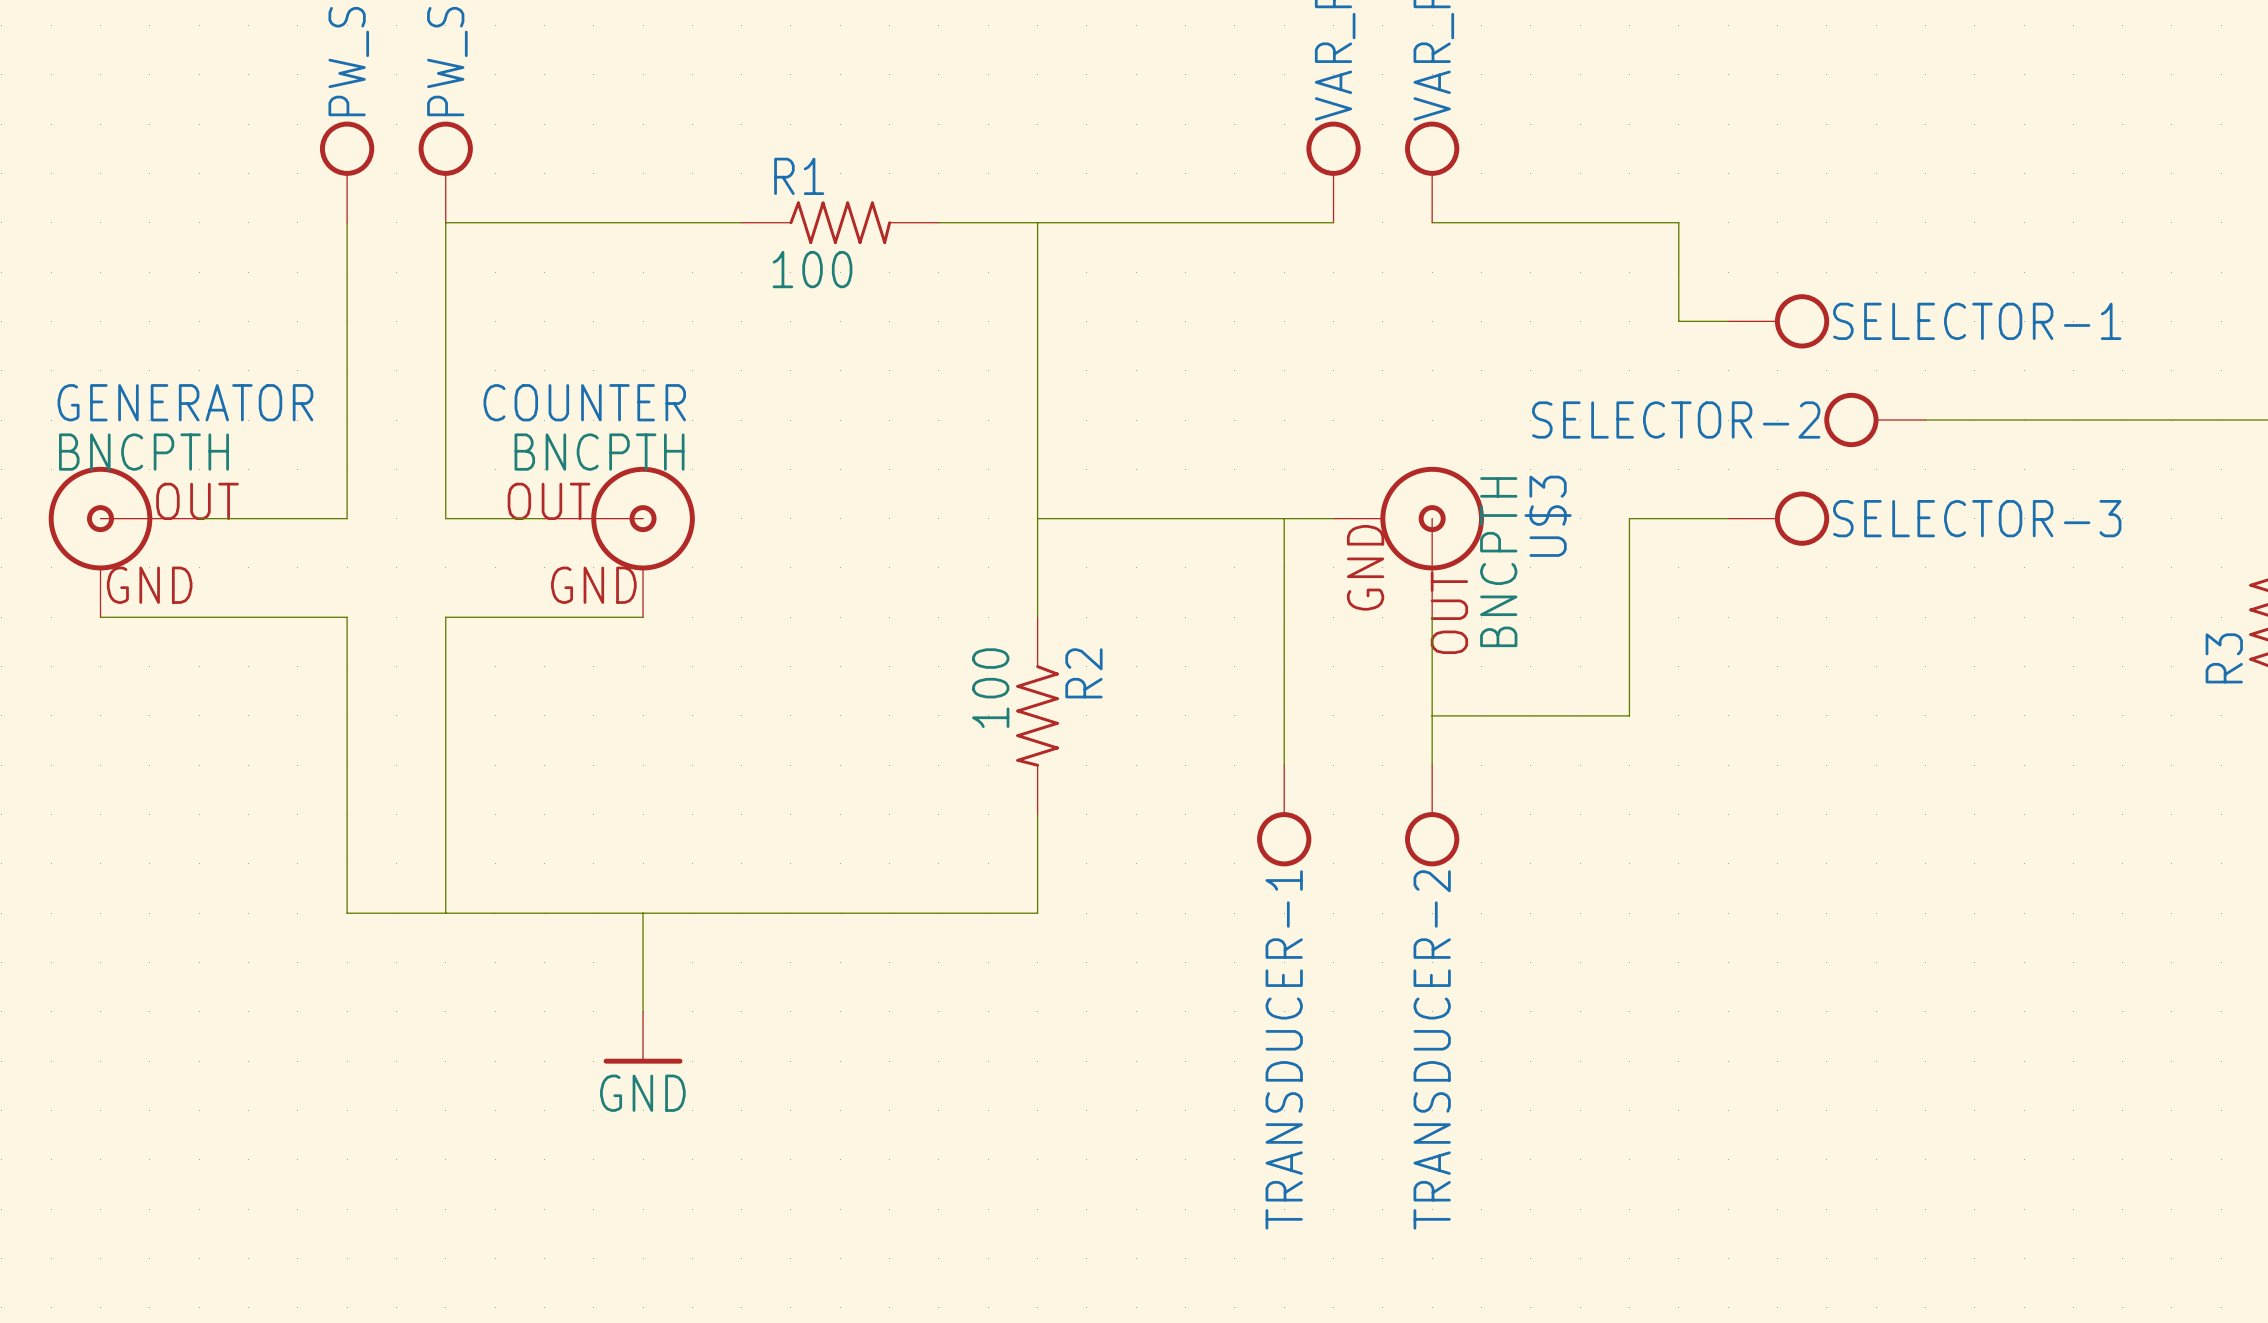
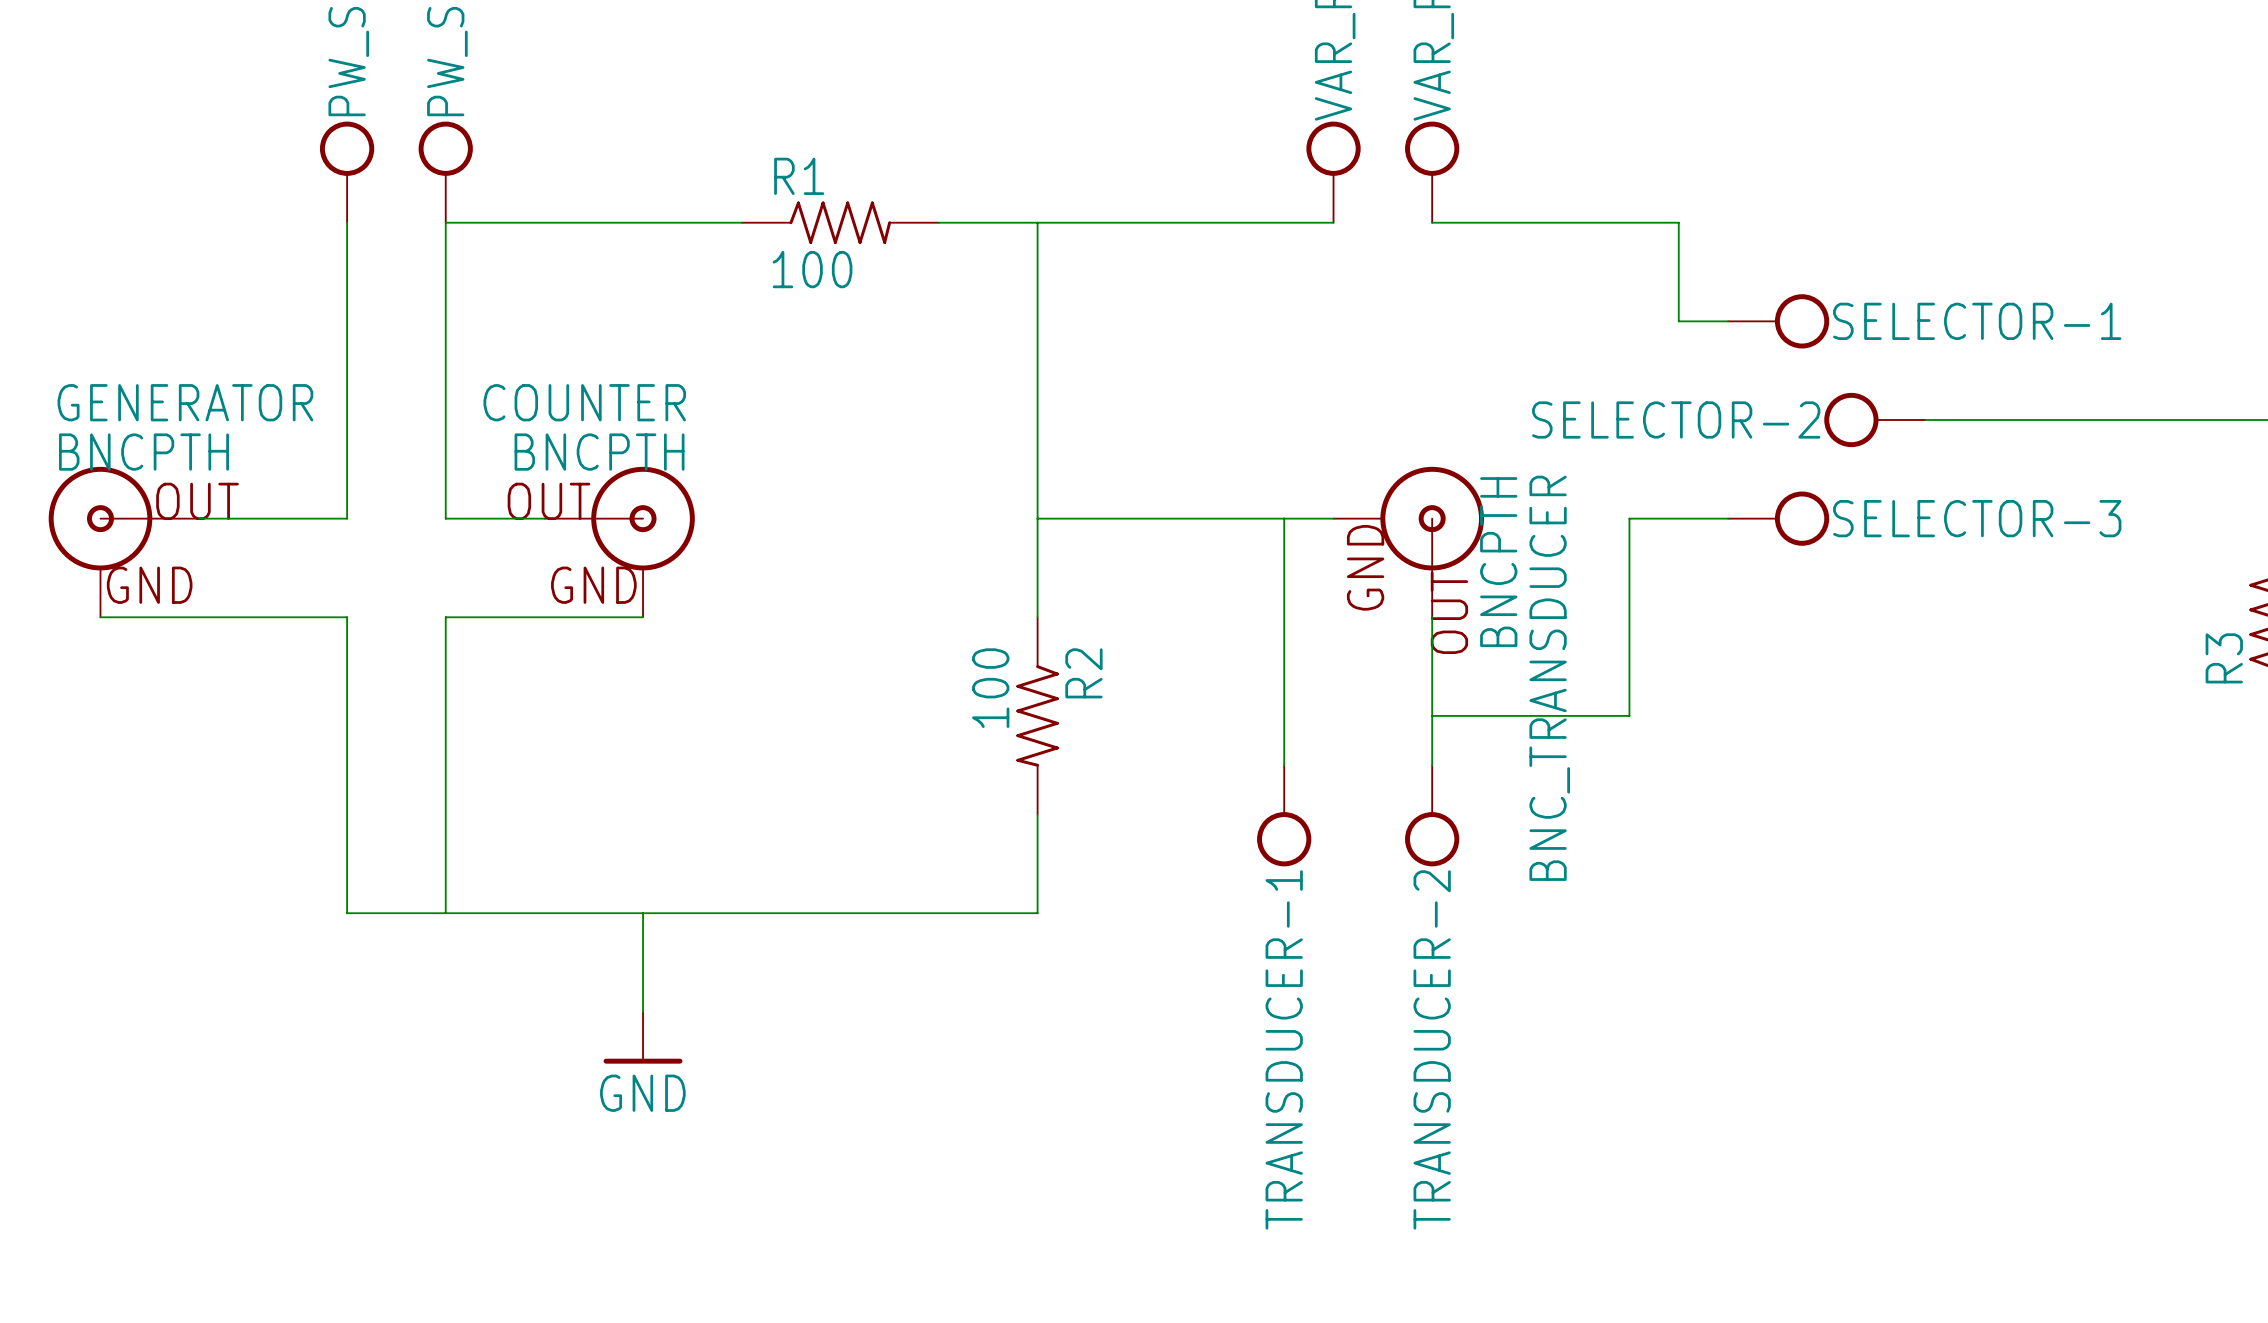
U$3 name: U$3 (1548, 516) -> BNC_TRANSDUCER (1549, 678)

